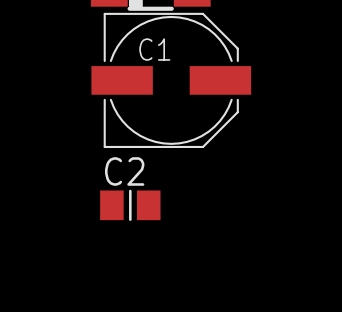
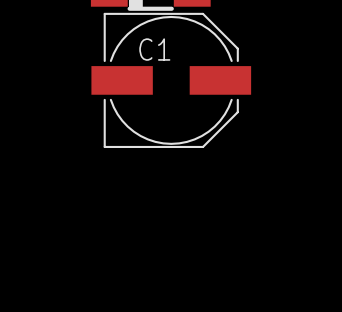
C2: (130, 205) -> none

